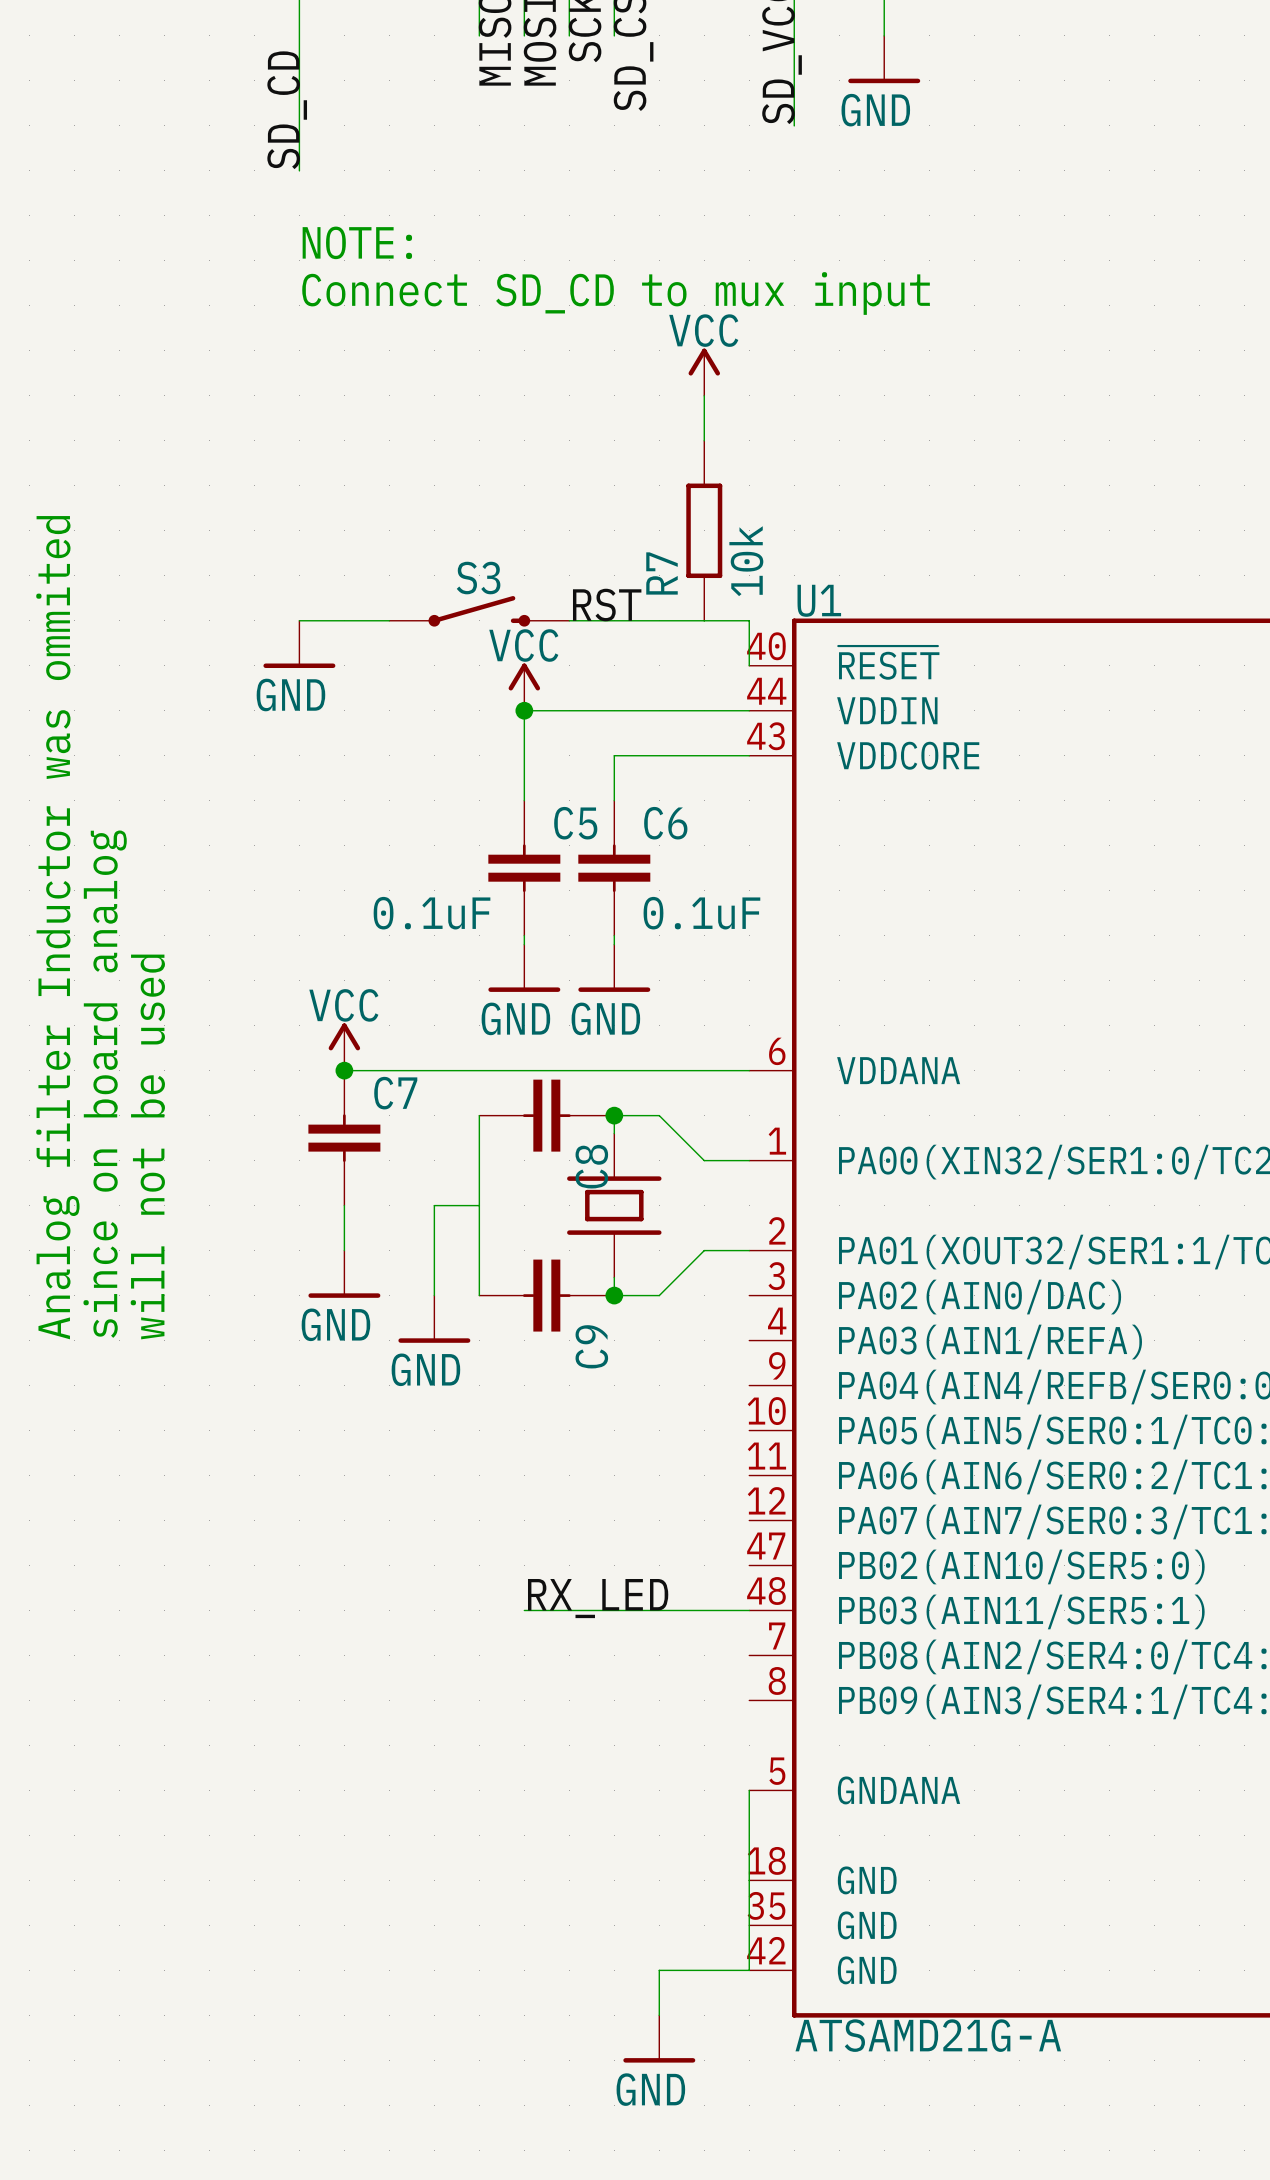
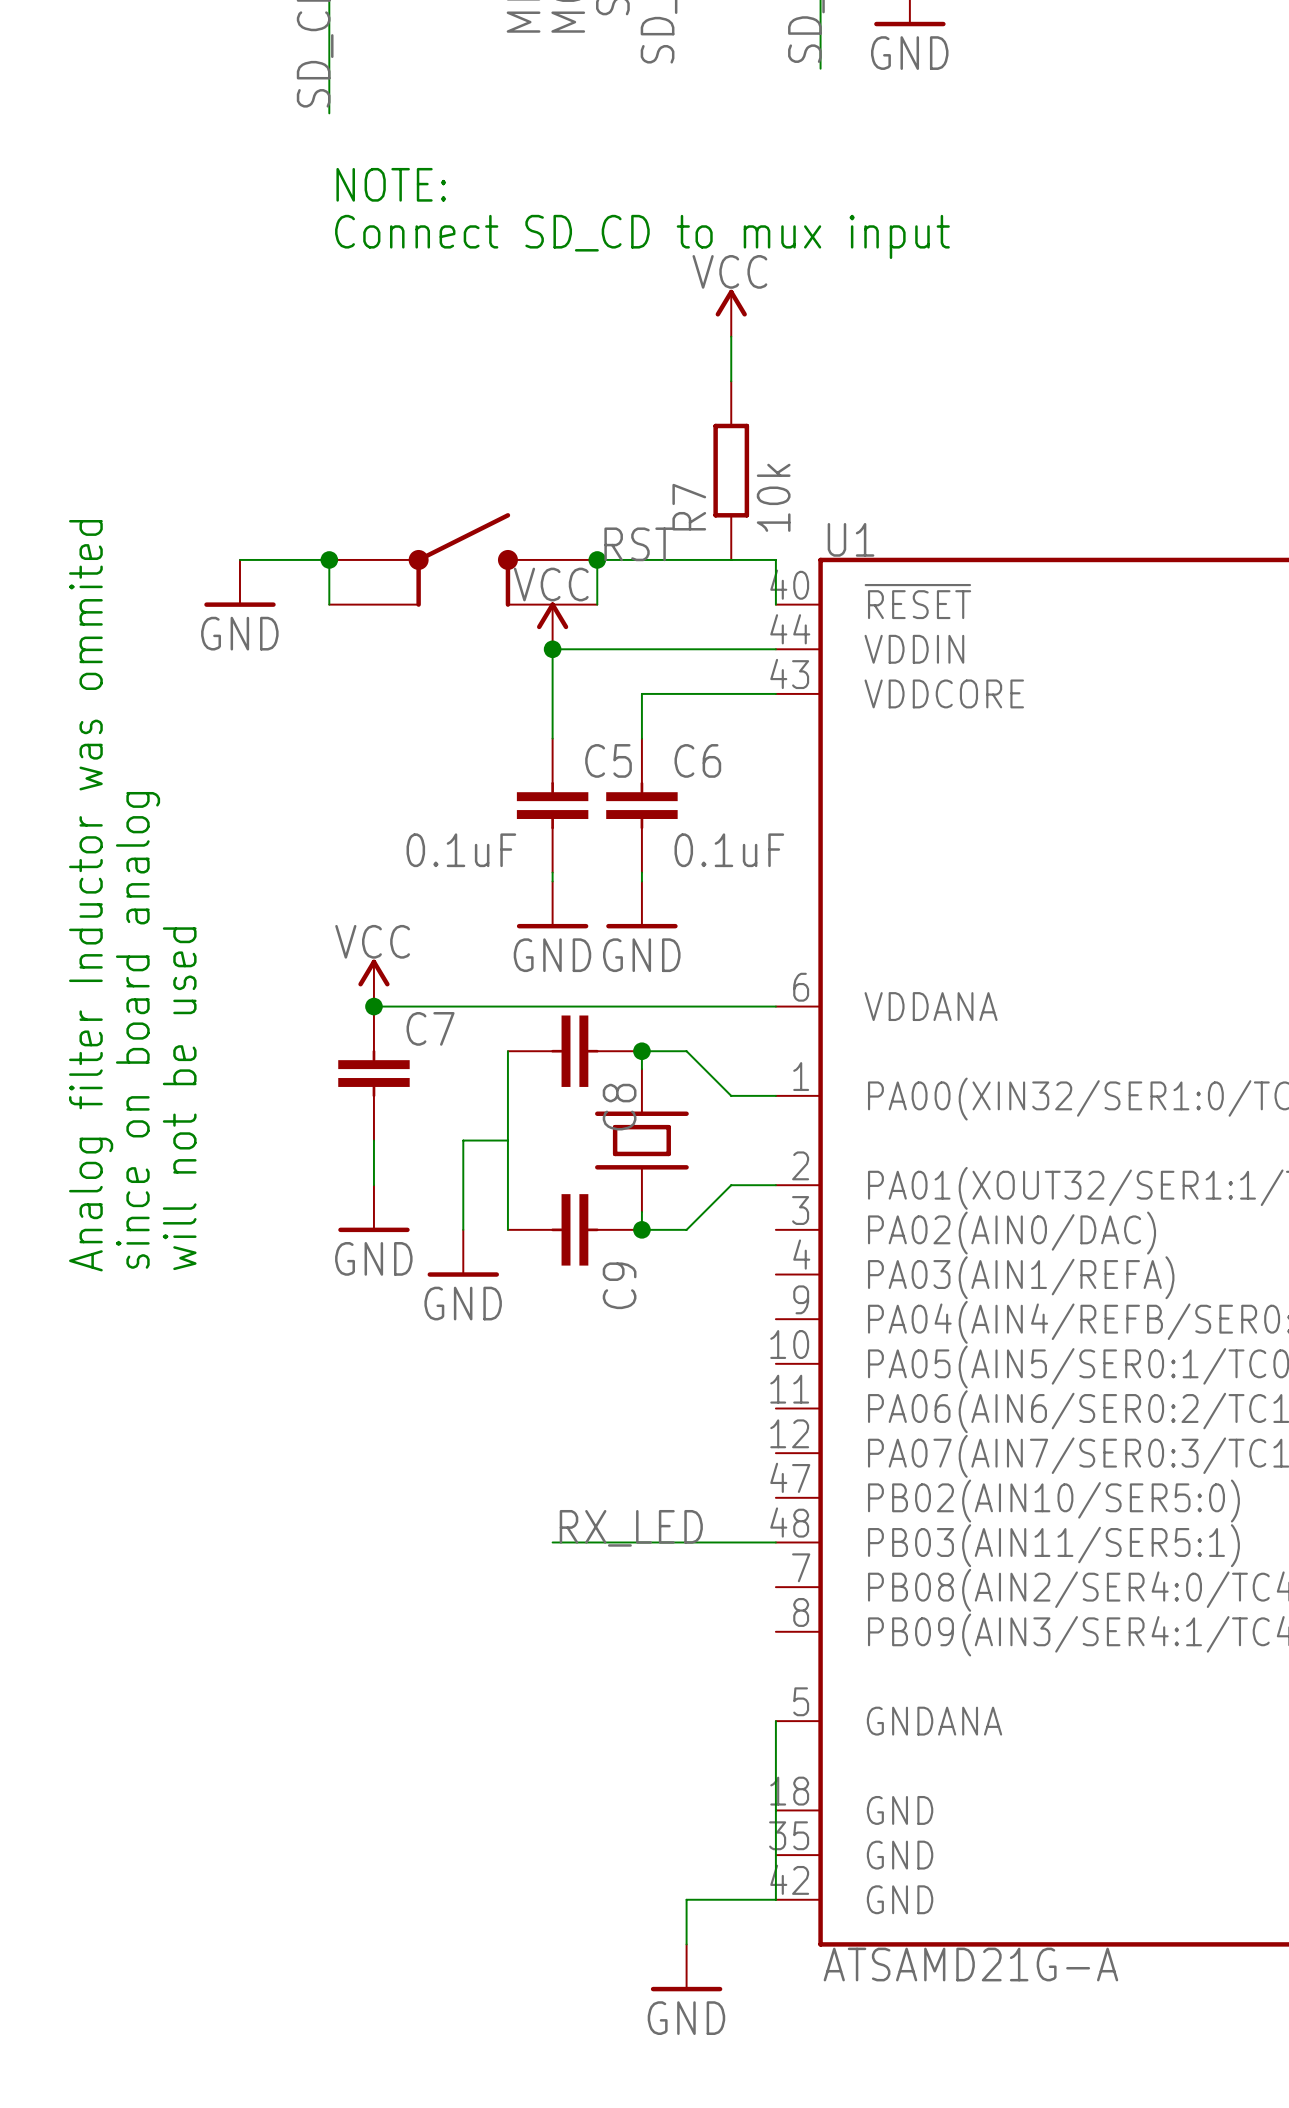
S3: (479, 611) -> none
wire: none -> (239, 559) (329, 559) (329, 604)
junction: none -> (329, 559)
part: none -> (463, 559)
wire: none -> (597, 559) (597, 604)
junction: none -> (597, 559)
power symbol position: GND (299, 644) -> GND (239, 583)

